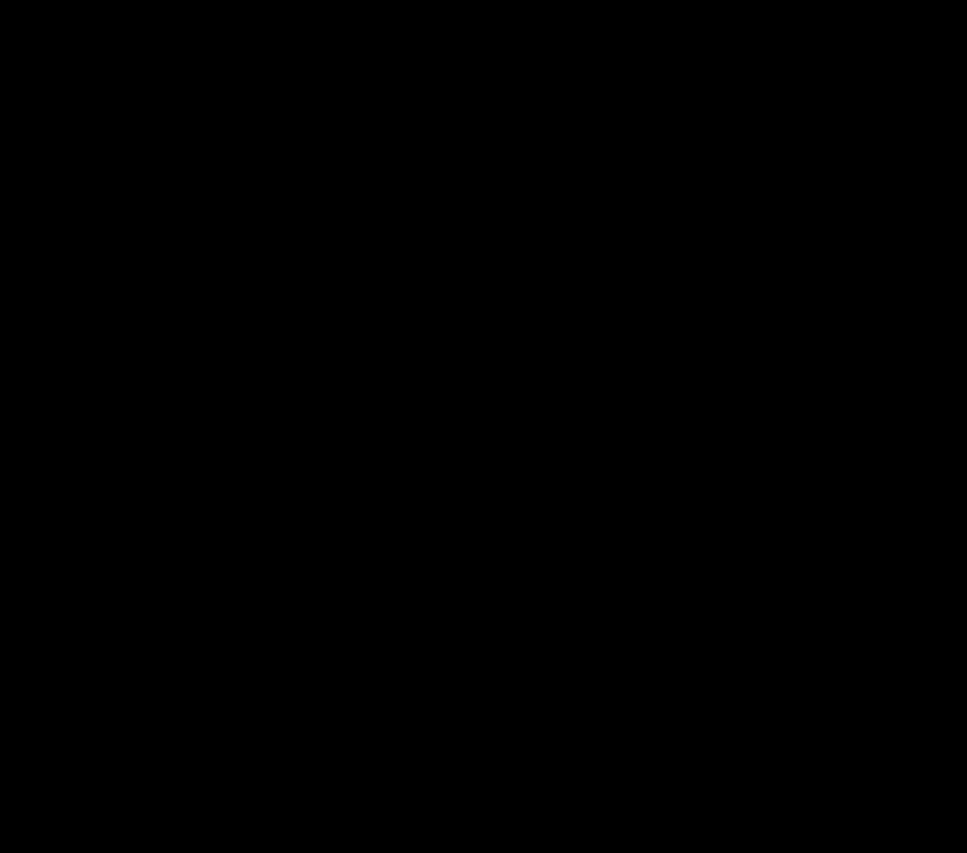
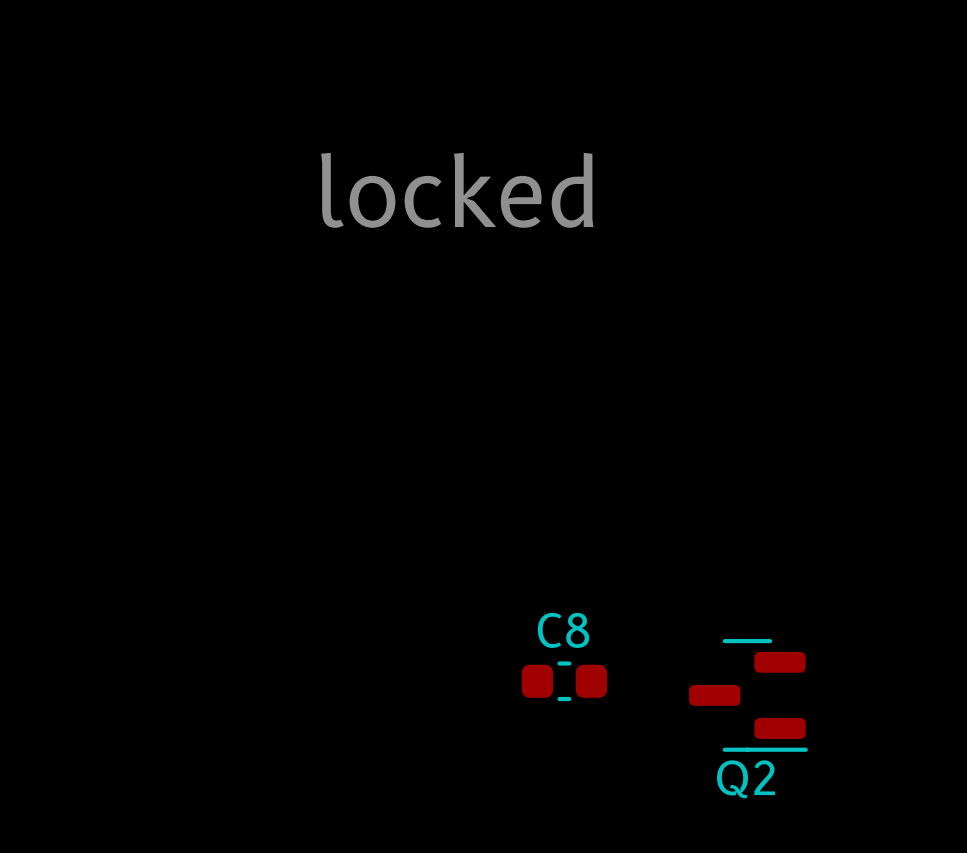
text: none -> locked (457, 190)
C8: none -> (564, 681)
Q2: none -> (748, 695)

